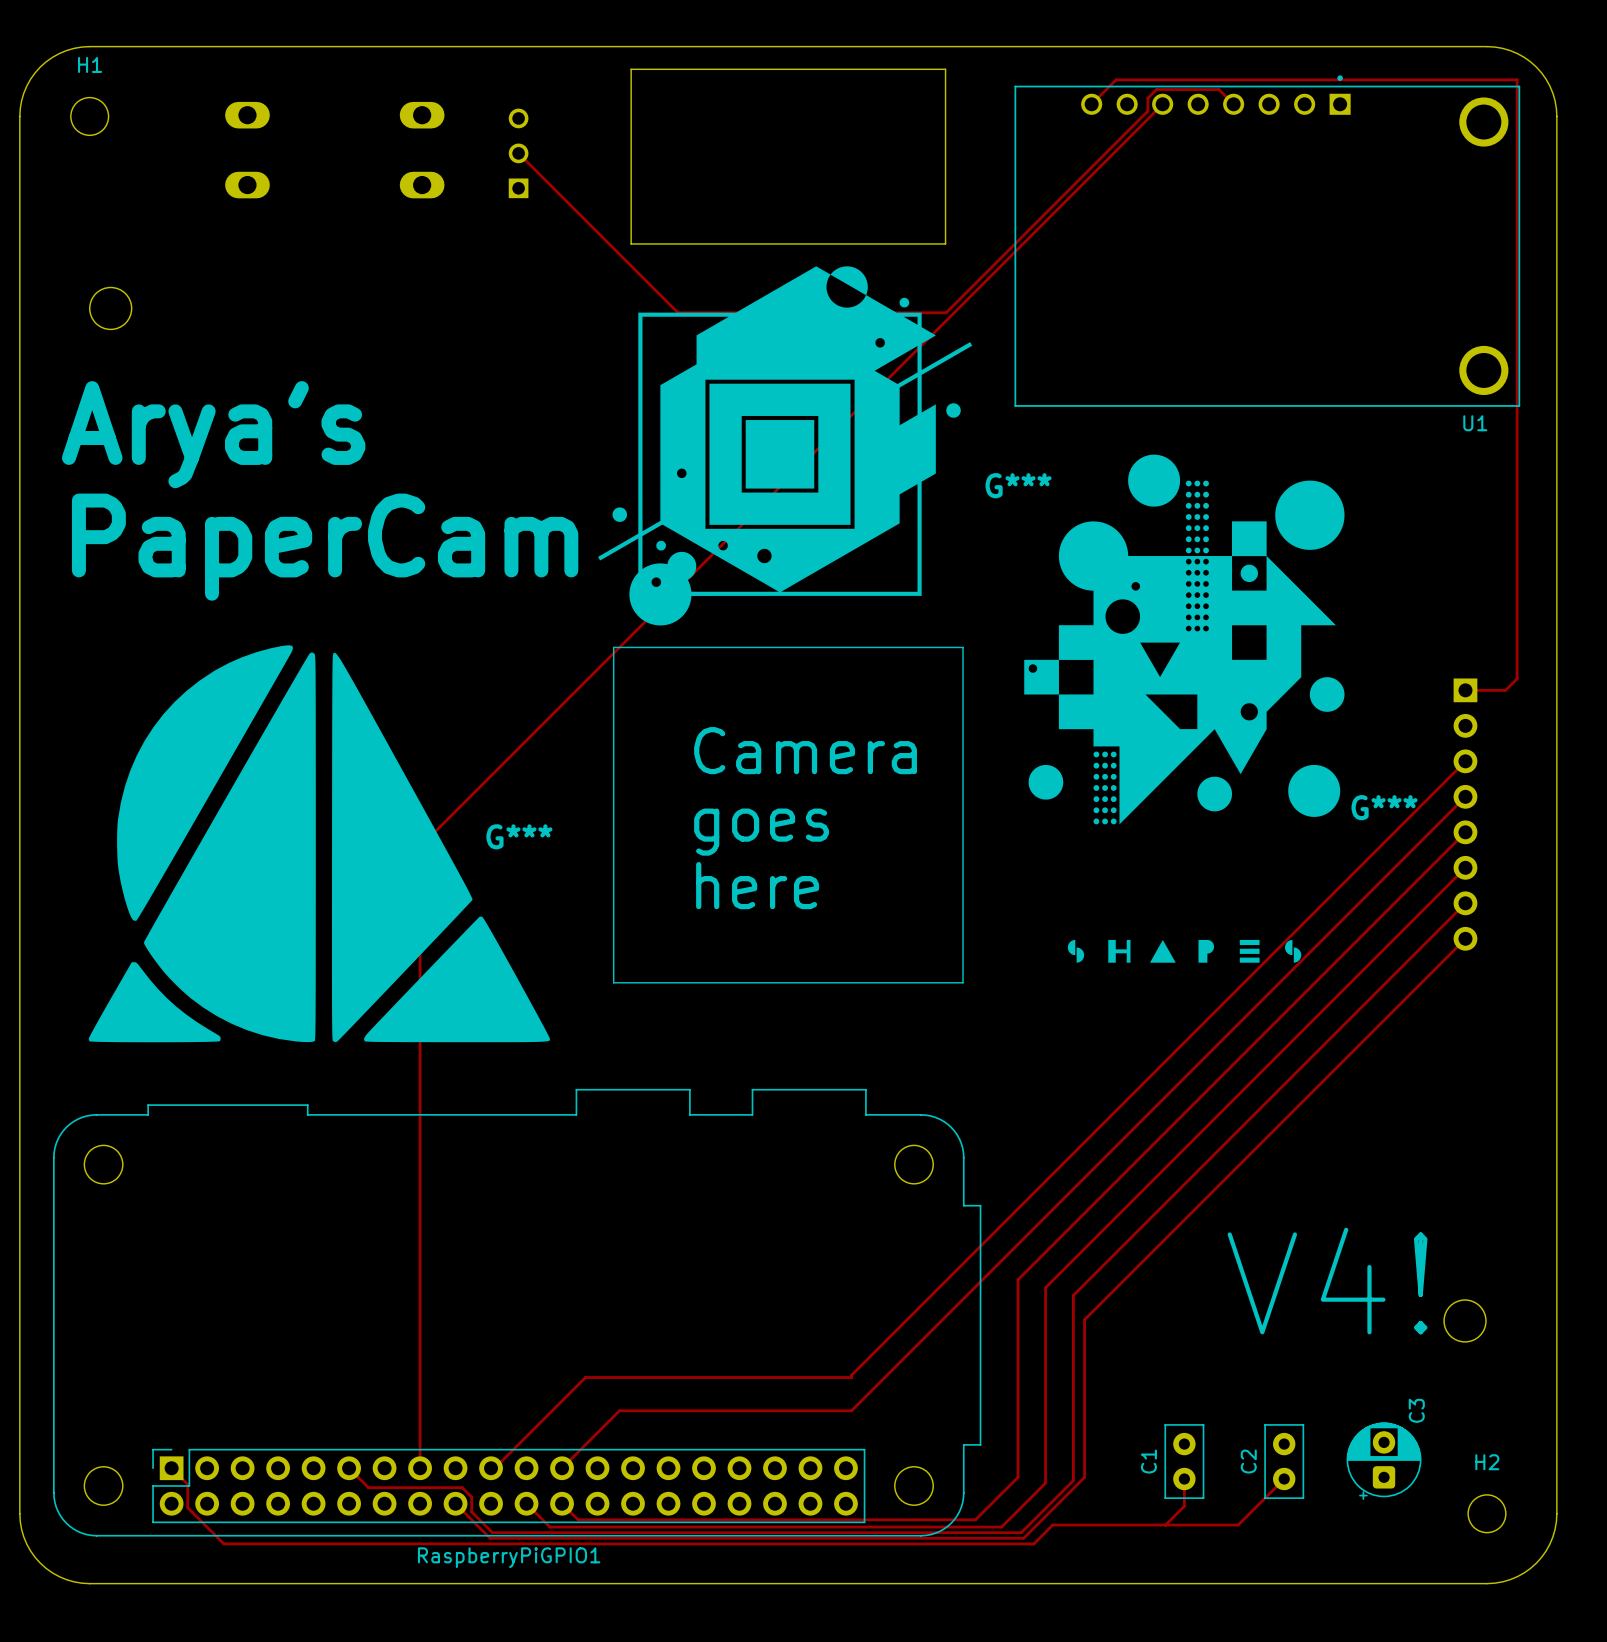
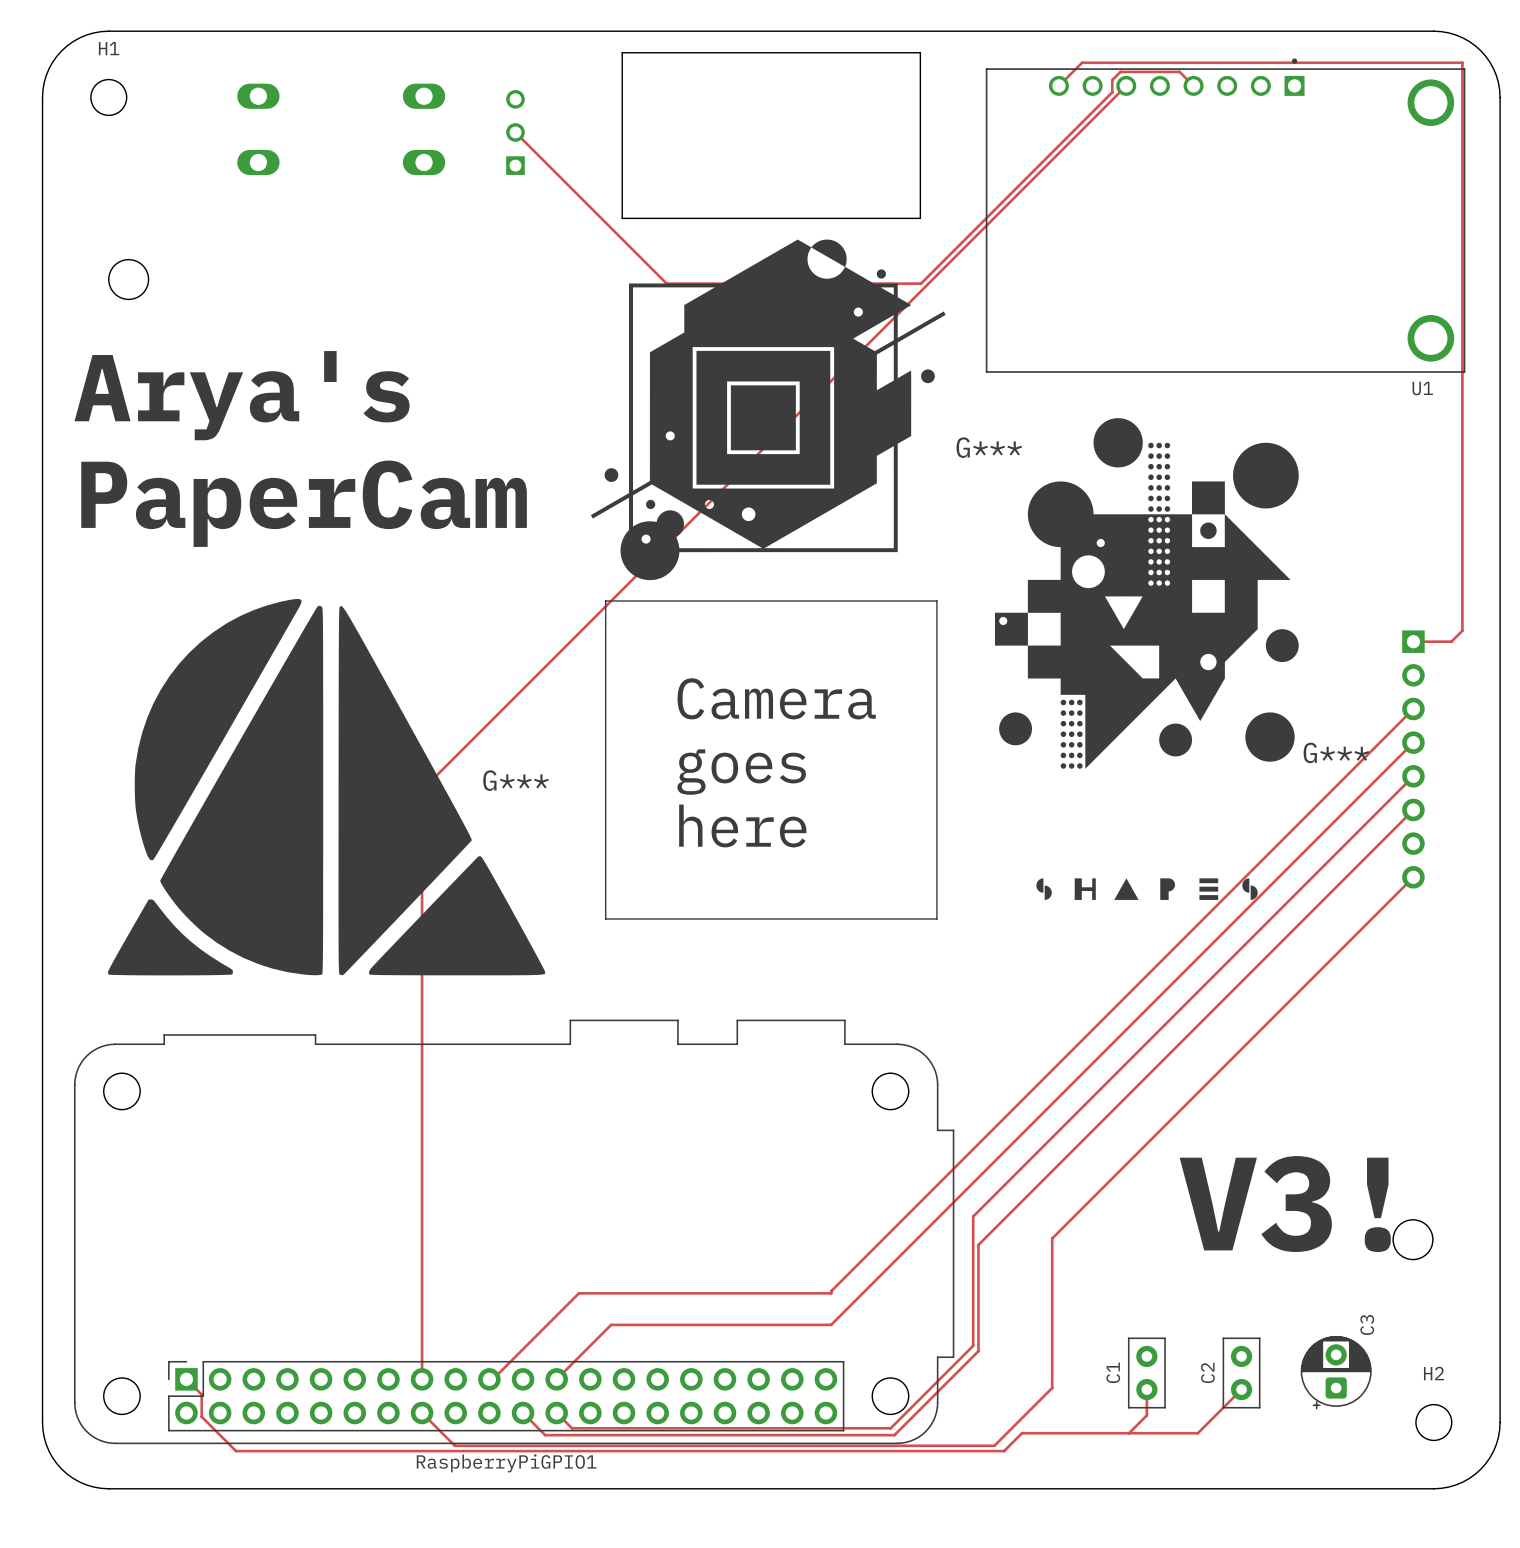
track: (1465, 903) (1073, 1295) (1073, 1480) (1021, 1532) (492, 1532) (471, 1511) (471, 1497) (462, 1487) (368, 1487) (349, 1468) -> none
track: (1018, 1279) (1018, 1477) (975, 1519) (914, 1519) -> (989, 1200) (973, 1216) (973, 1345) (890, 1428)
text: V4! (1327, 1281) -> V3! (1285, 1204)
track: (1045, 1287) (1045, 1483) (1001, 1527) (918, 1527) -> (1015, 1208) (978, 1244) (978, 1351) (894, 1435)
track: (455, 1503) (490, 1538) -> (422, 1413) (454, 1445) (488, 1445)

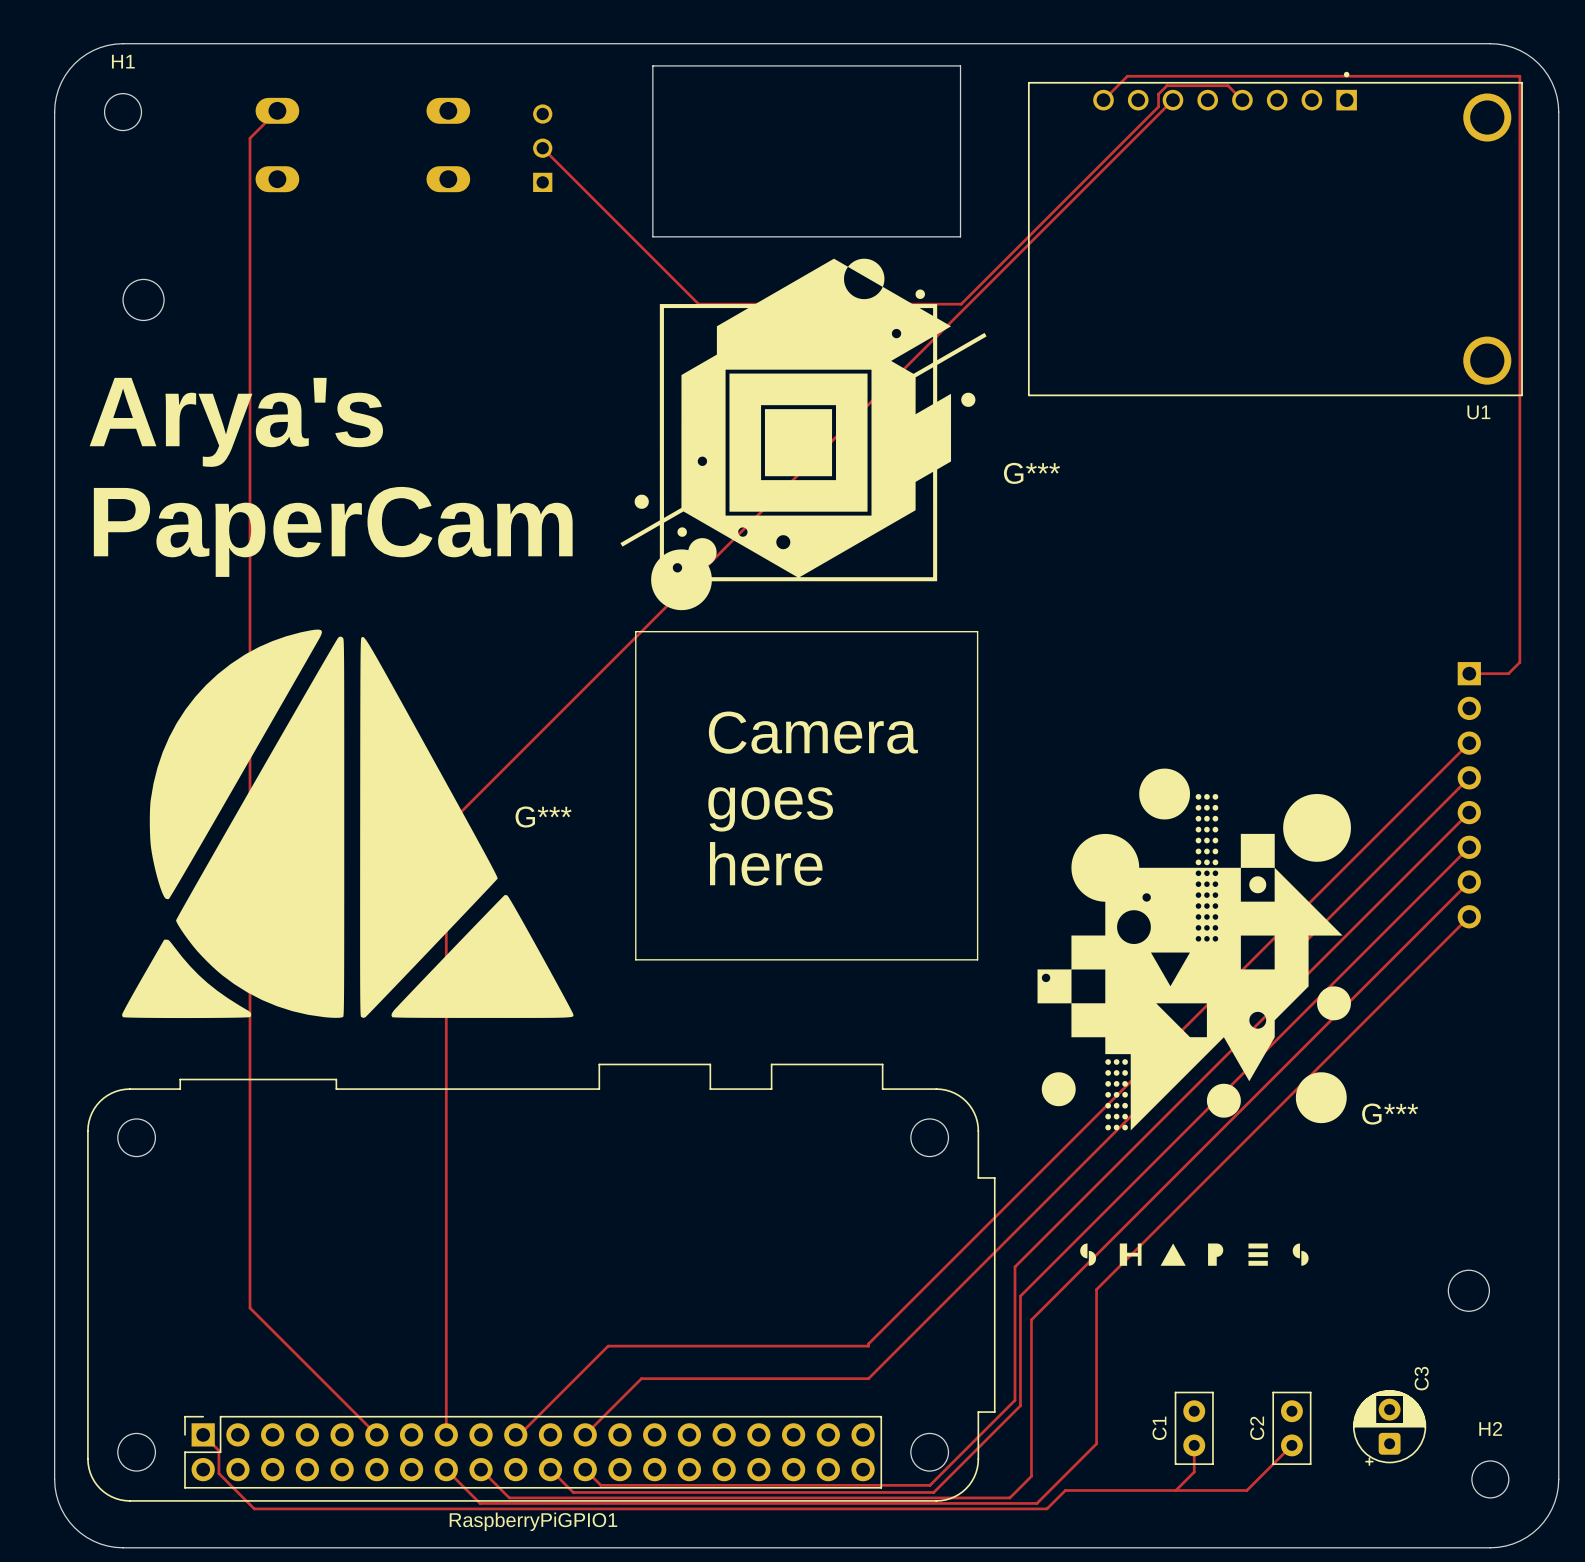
track: none -> (277, 110) (250, 138) (250, 1308) (376, 1434)
G*** position: (1146, 659) -> (1194, 1017)
track: none -> (1469, 882) (1031, 1319) (1031, 1476) (1009, 1497) (509, 1497) (481, 1469)
text: V3! (1285, 1204) -> none

